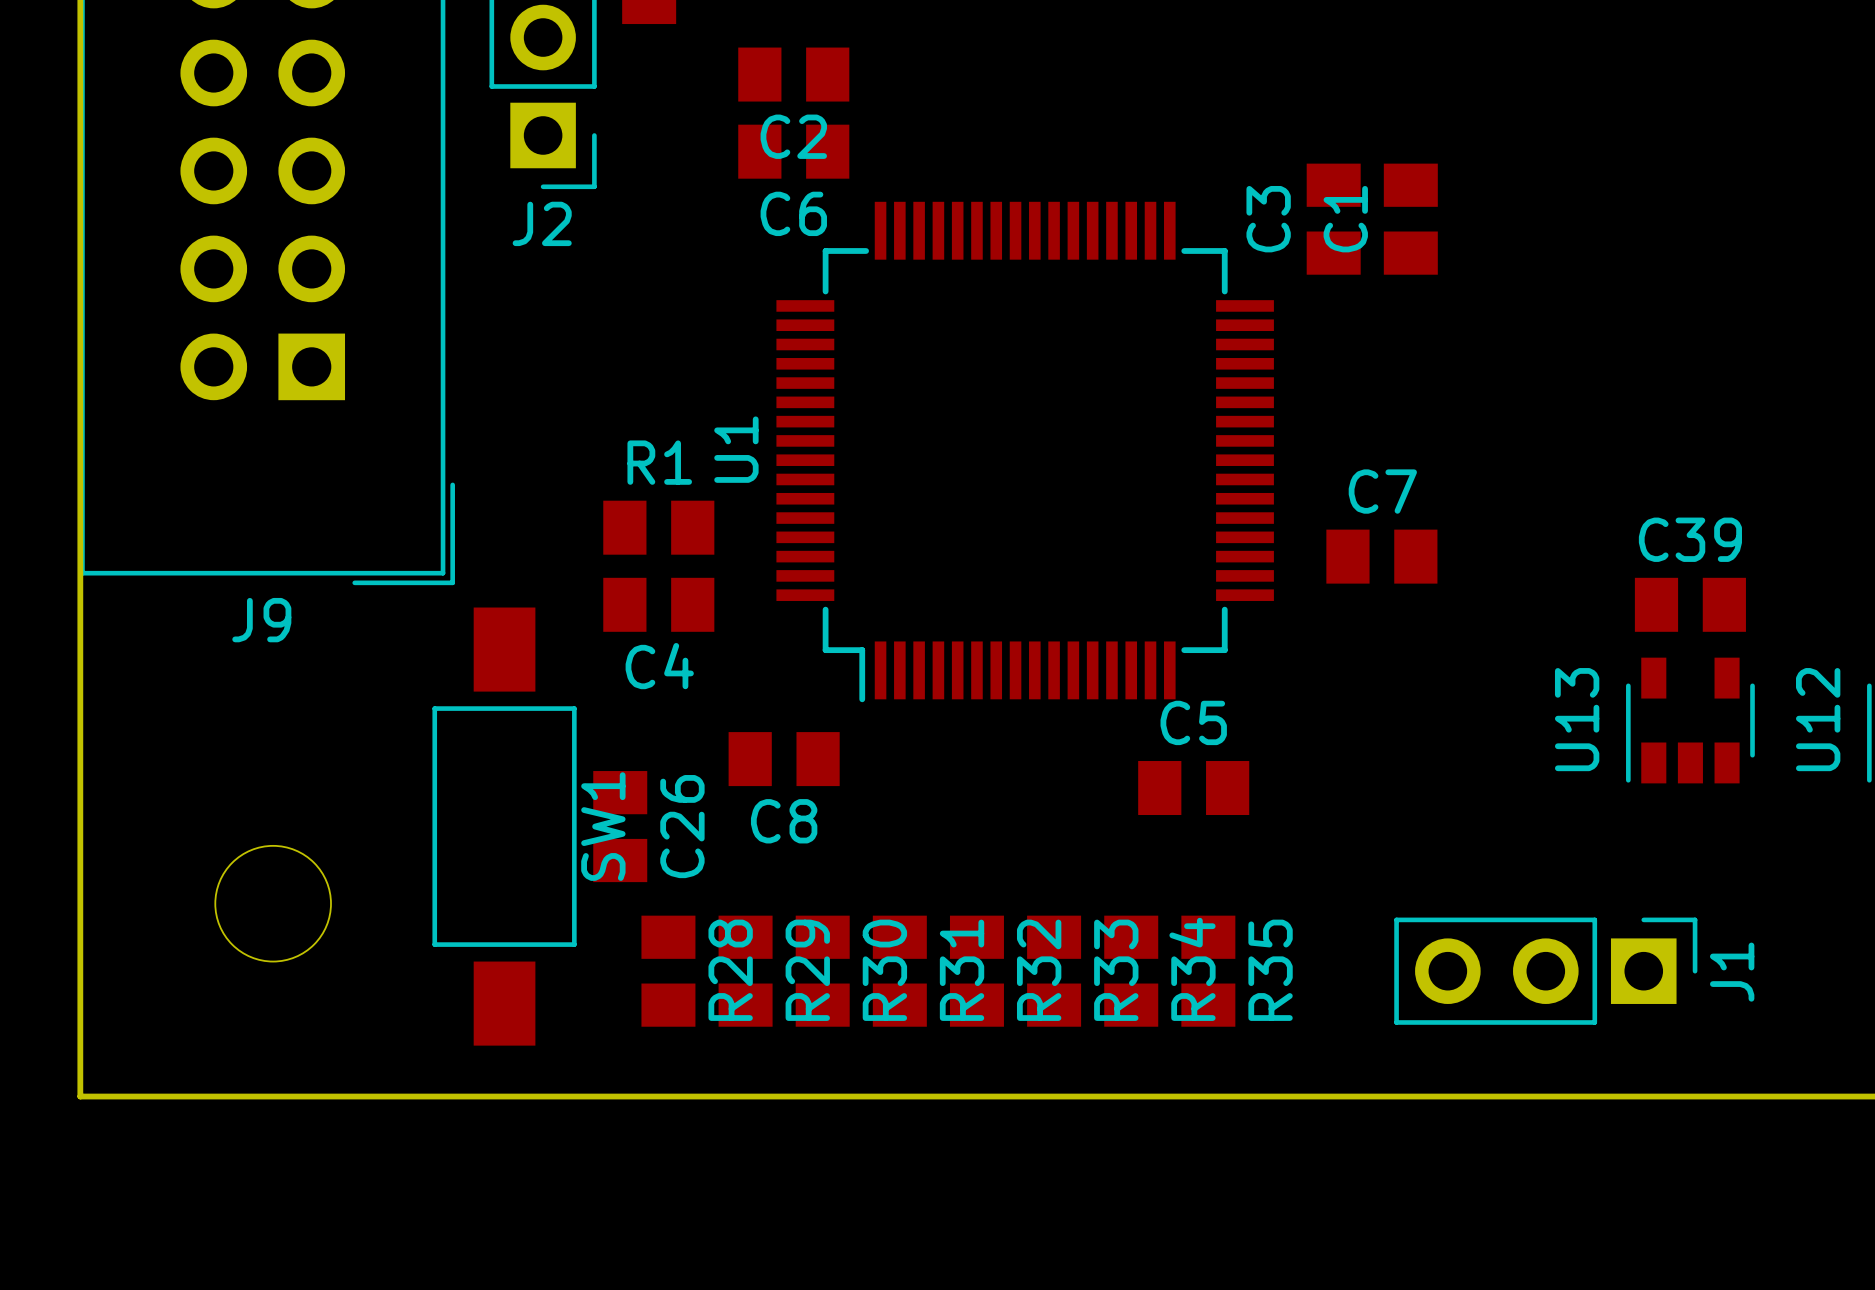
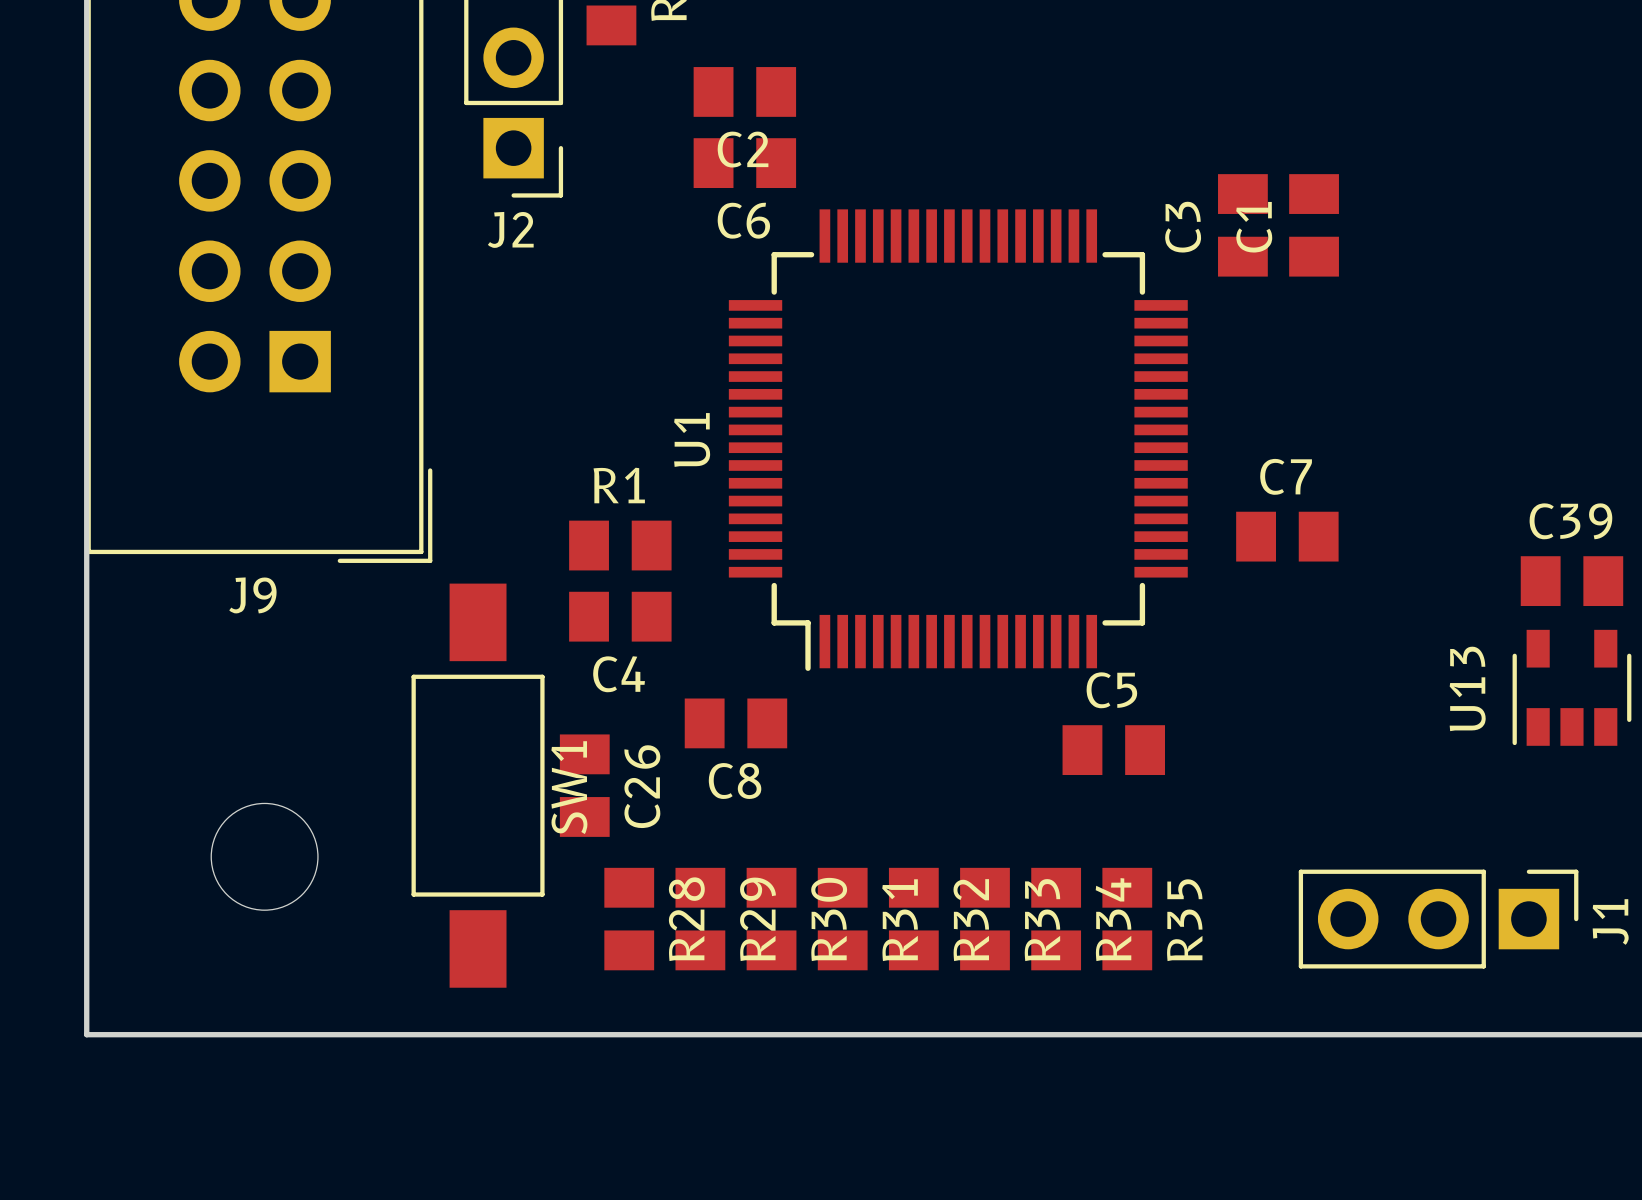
R1 position: (658, 527) -> (620, 545)
C4 position: (658, 604) -> (620, 616)

